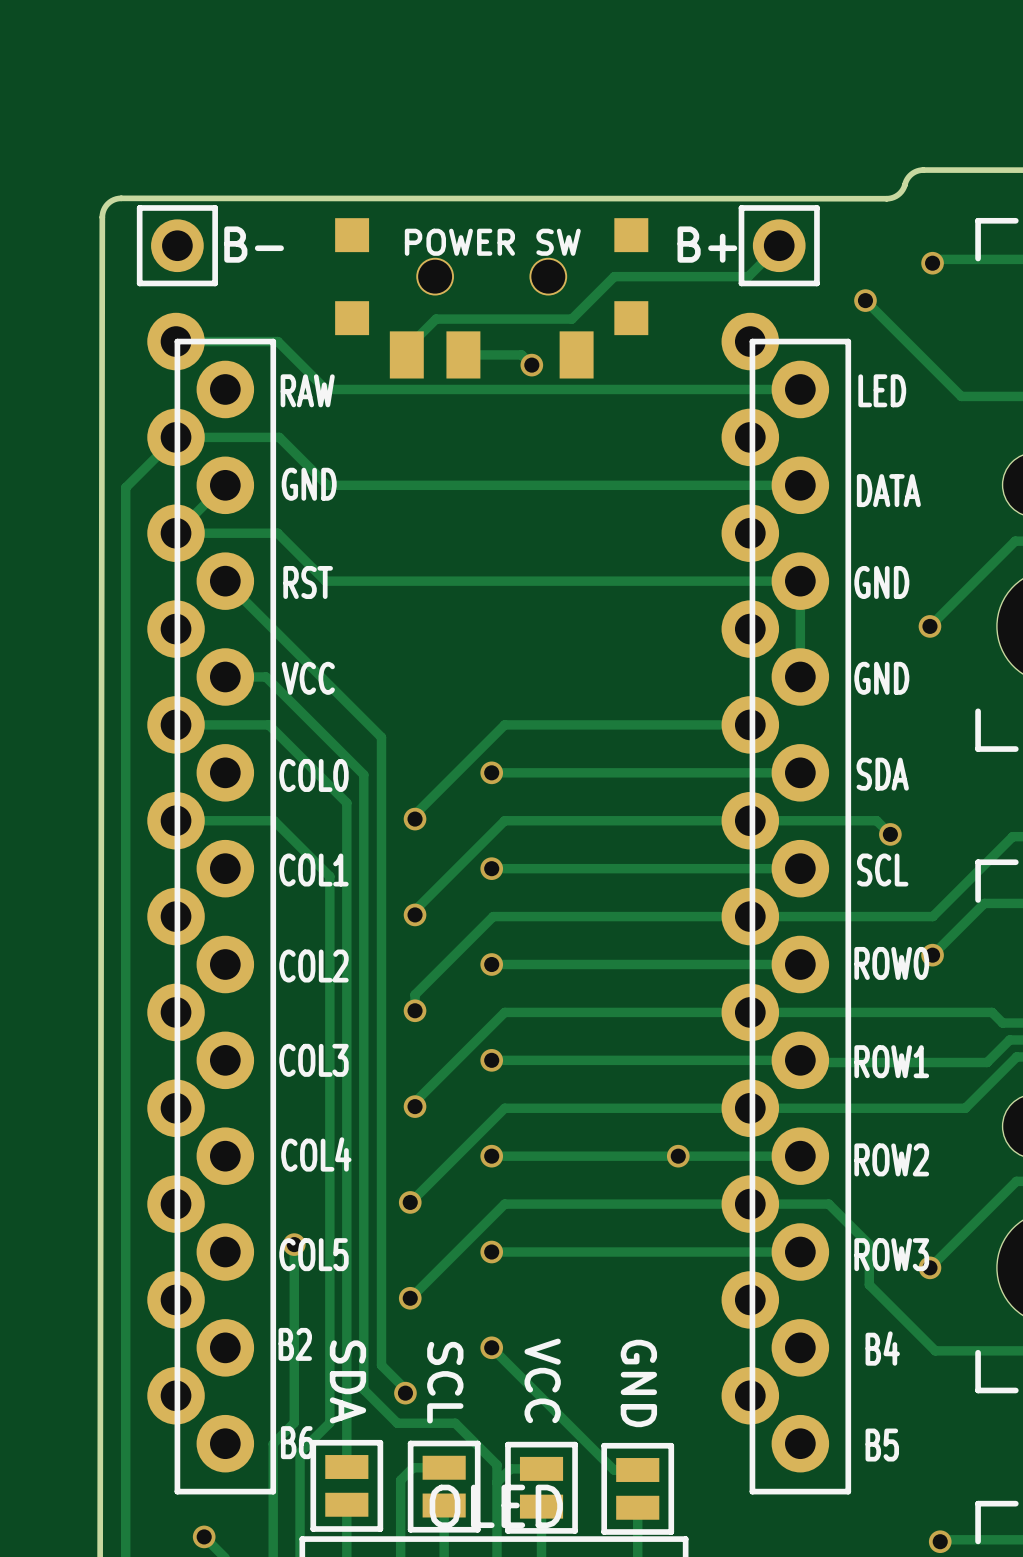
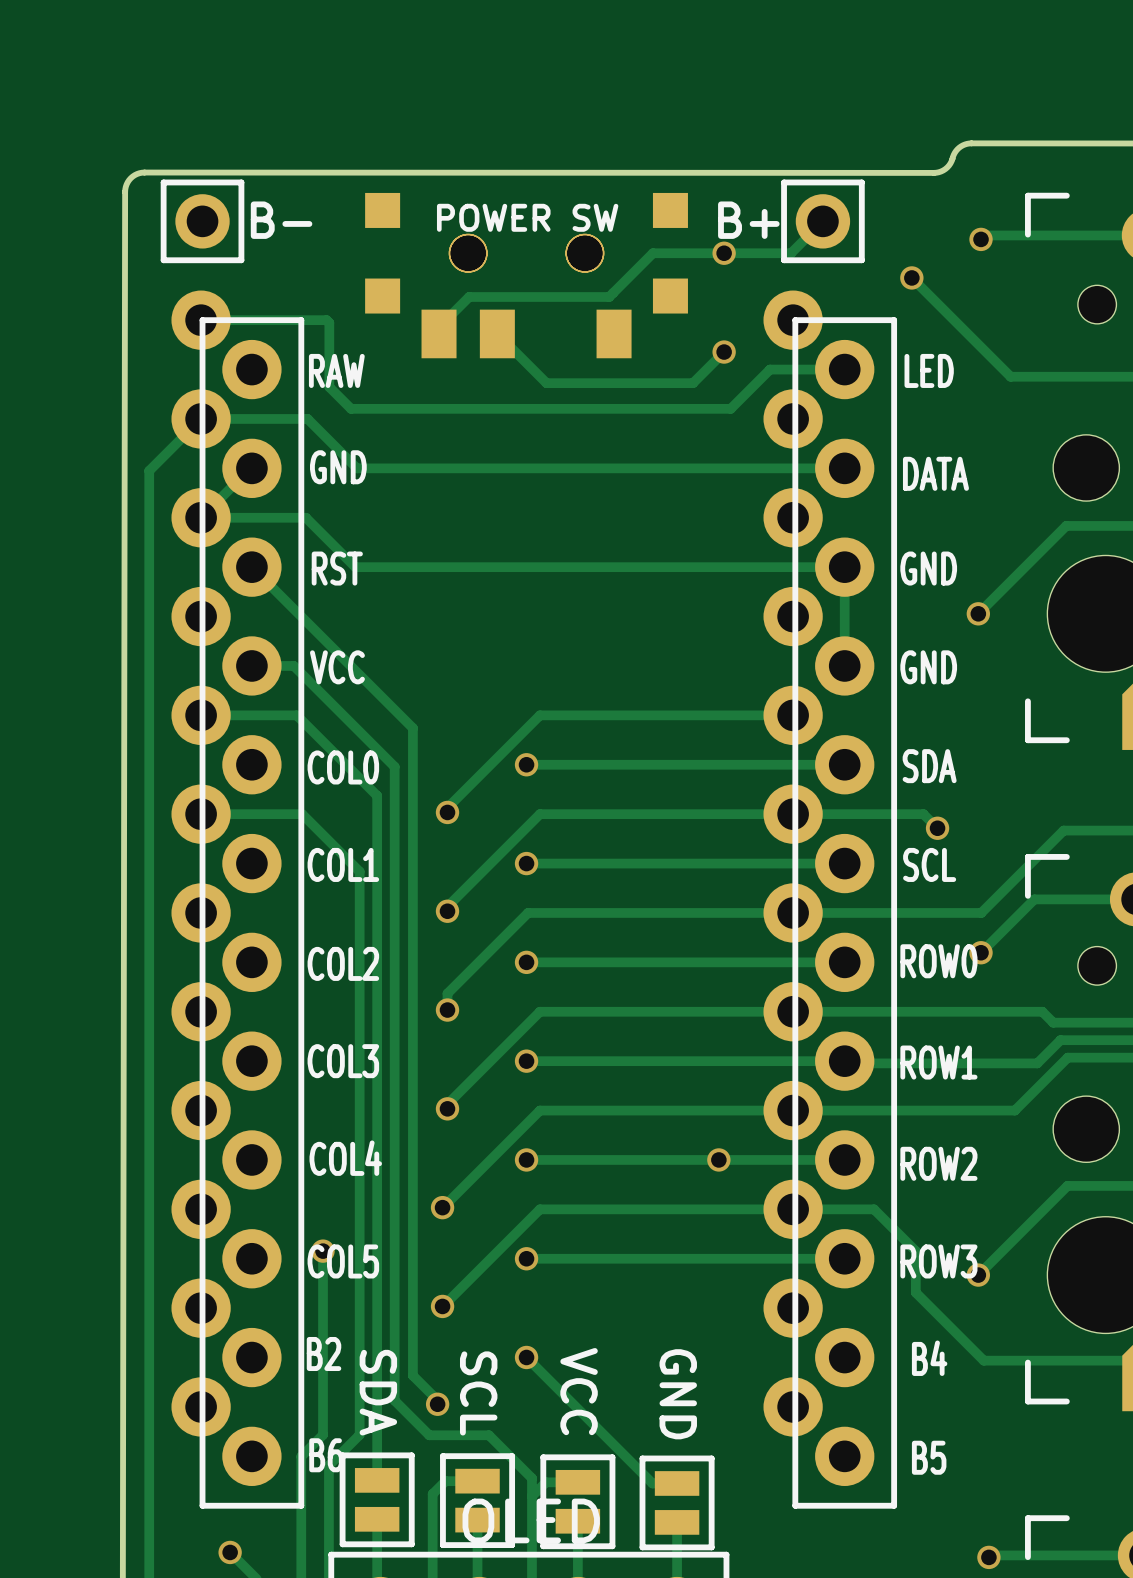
part: none -> (526, 253)
via: none -> (724, 253)
track: (277, 341) (325, 389) (727, 389) -> (306, 320) (326, 320) (329, 322) (329, 387) (351, 408) (730, 408) (770, 369)
track: (463, 354) (521, 354) (531, 365) -> (497, 333) (546, 383) (693, 383) (724, 352)
via: (531, 365) -> none
via: none -> (724, 352)

